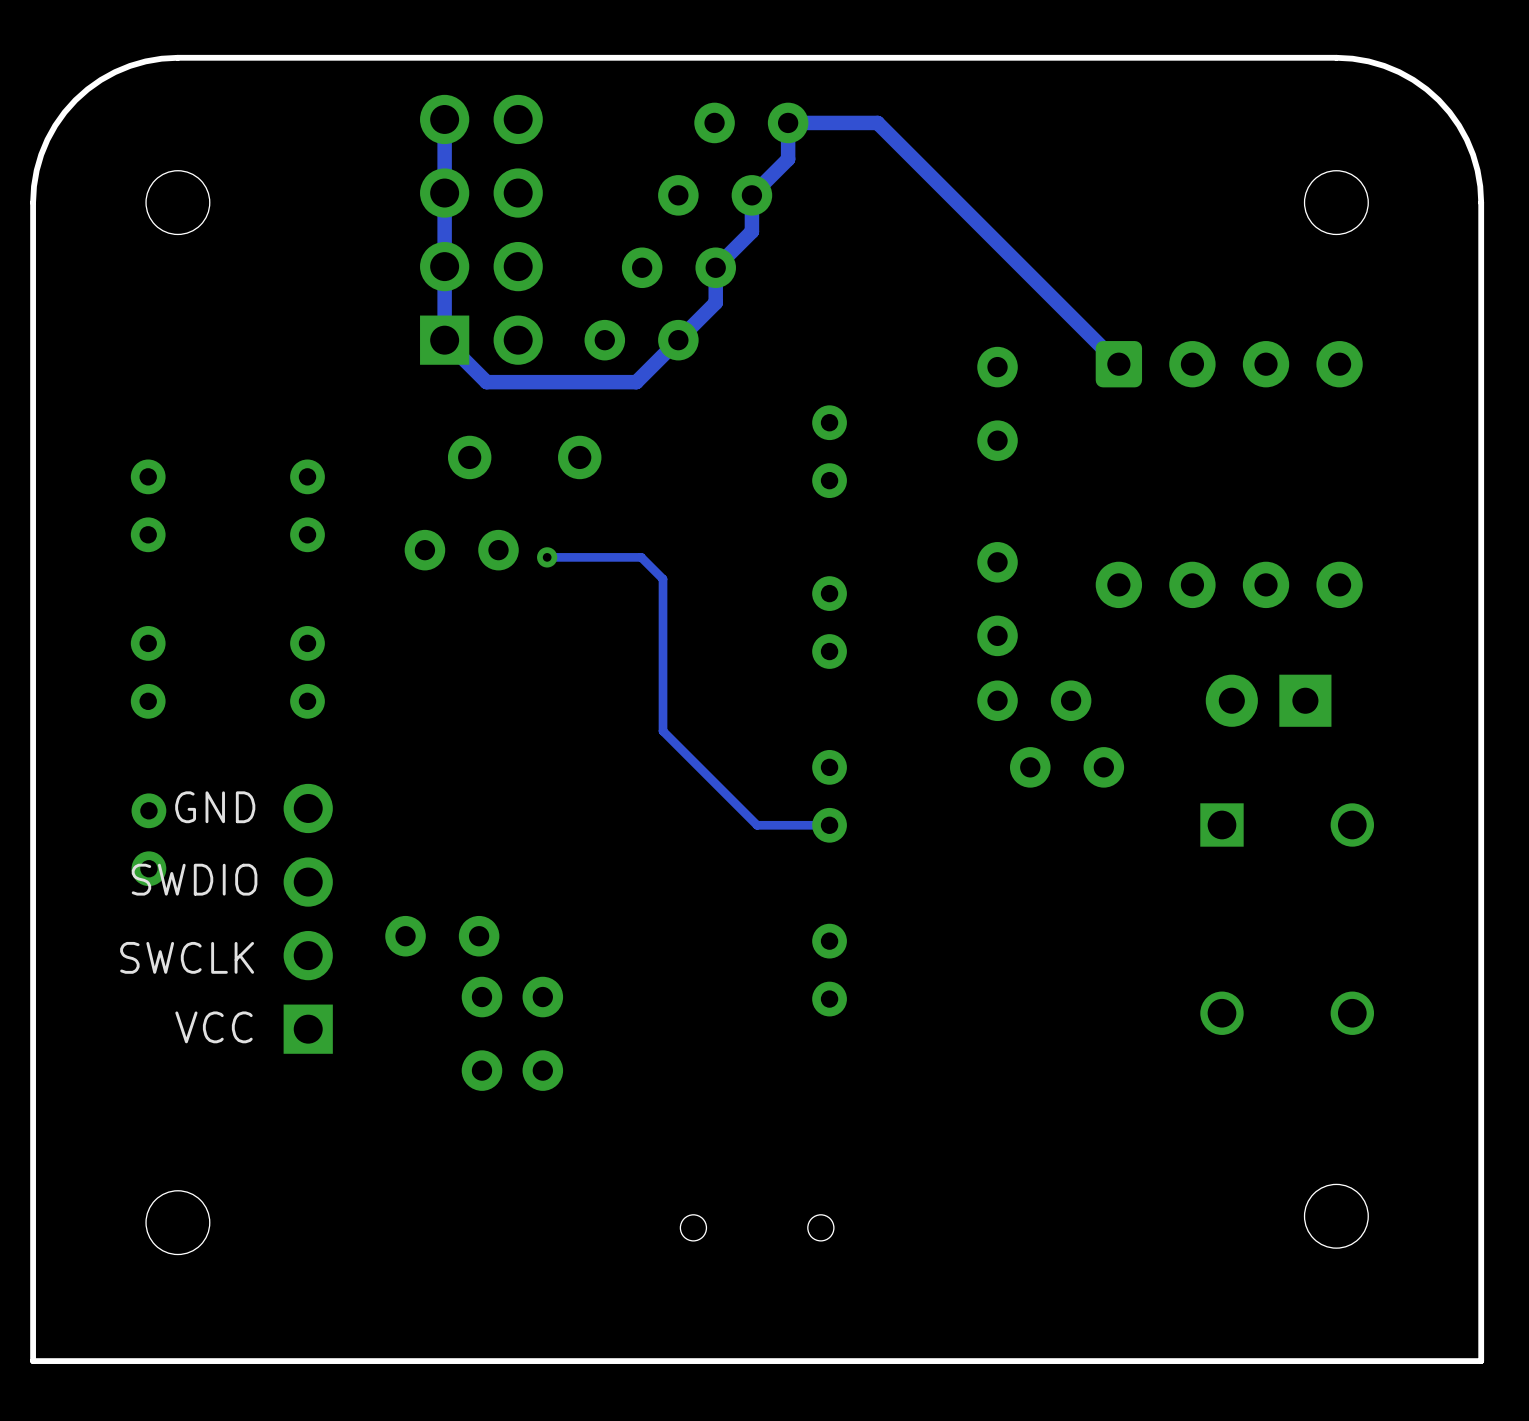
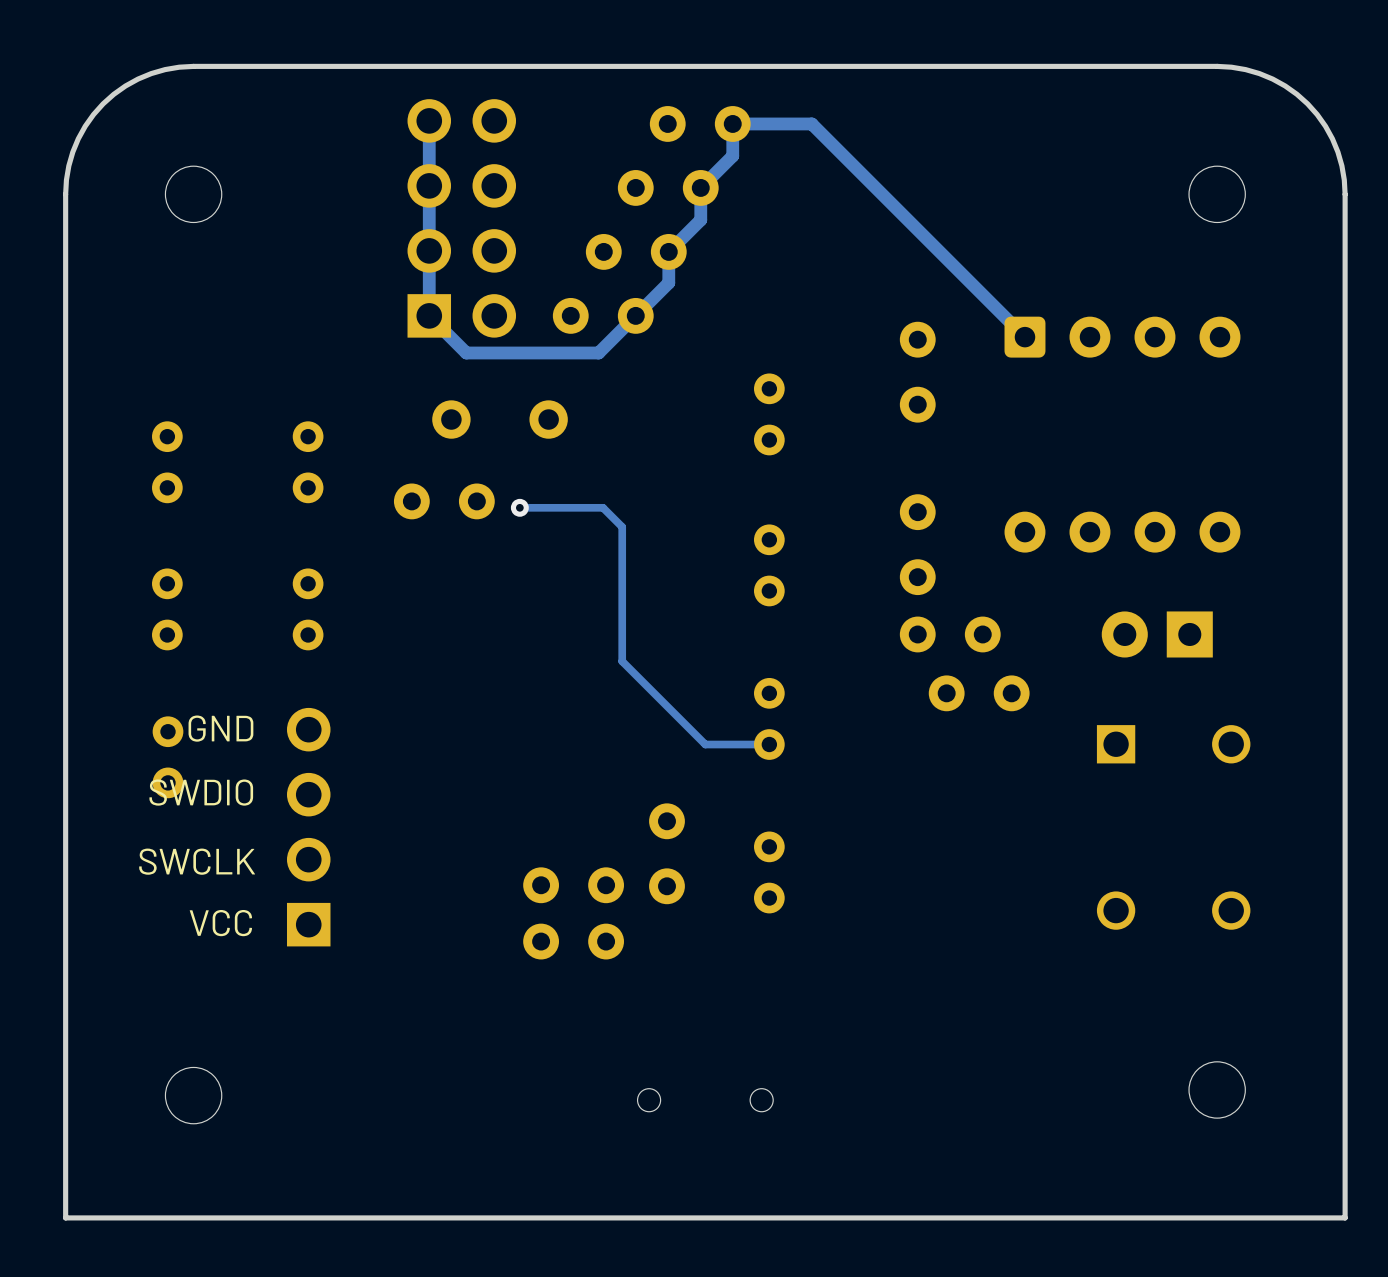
part: (442, 936) -> none
part: none -> (666, 853)
part: none -> (573, 885)
part: (482, 1033) -> none
part: (542, 1033) -> none
part: none -> (573, 941)

